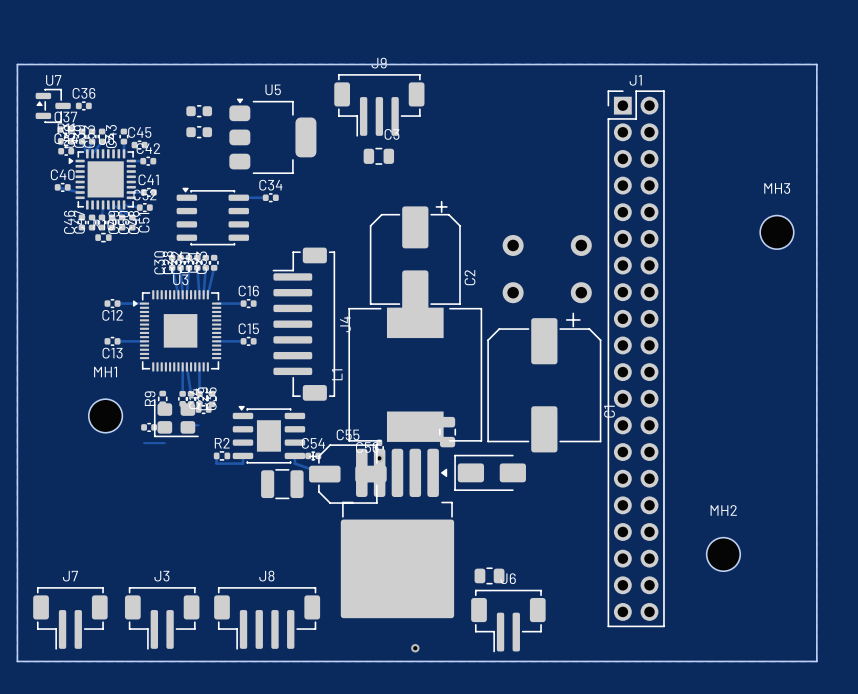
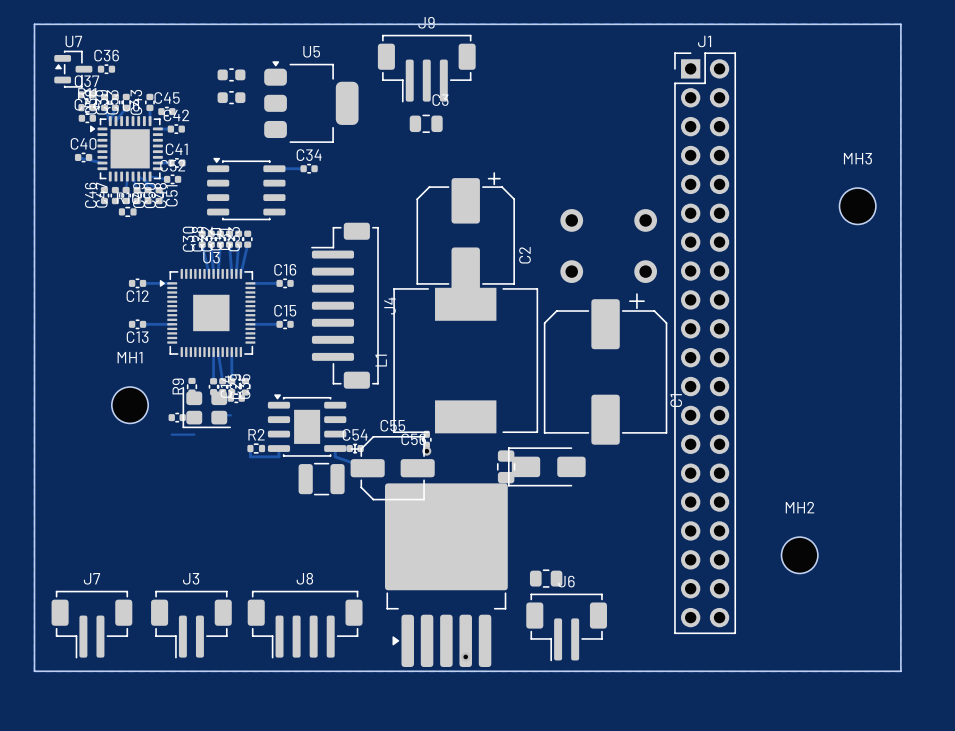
part position: (447, 432) -> (506, 466)
part rotation: 0° (397, 533) -> 180° (446, 575)

